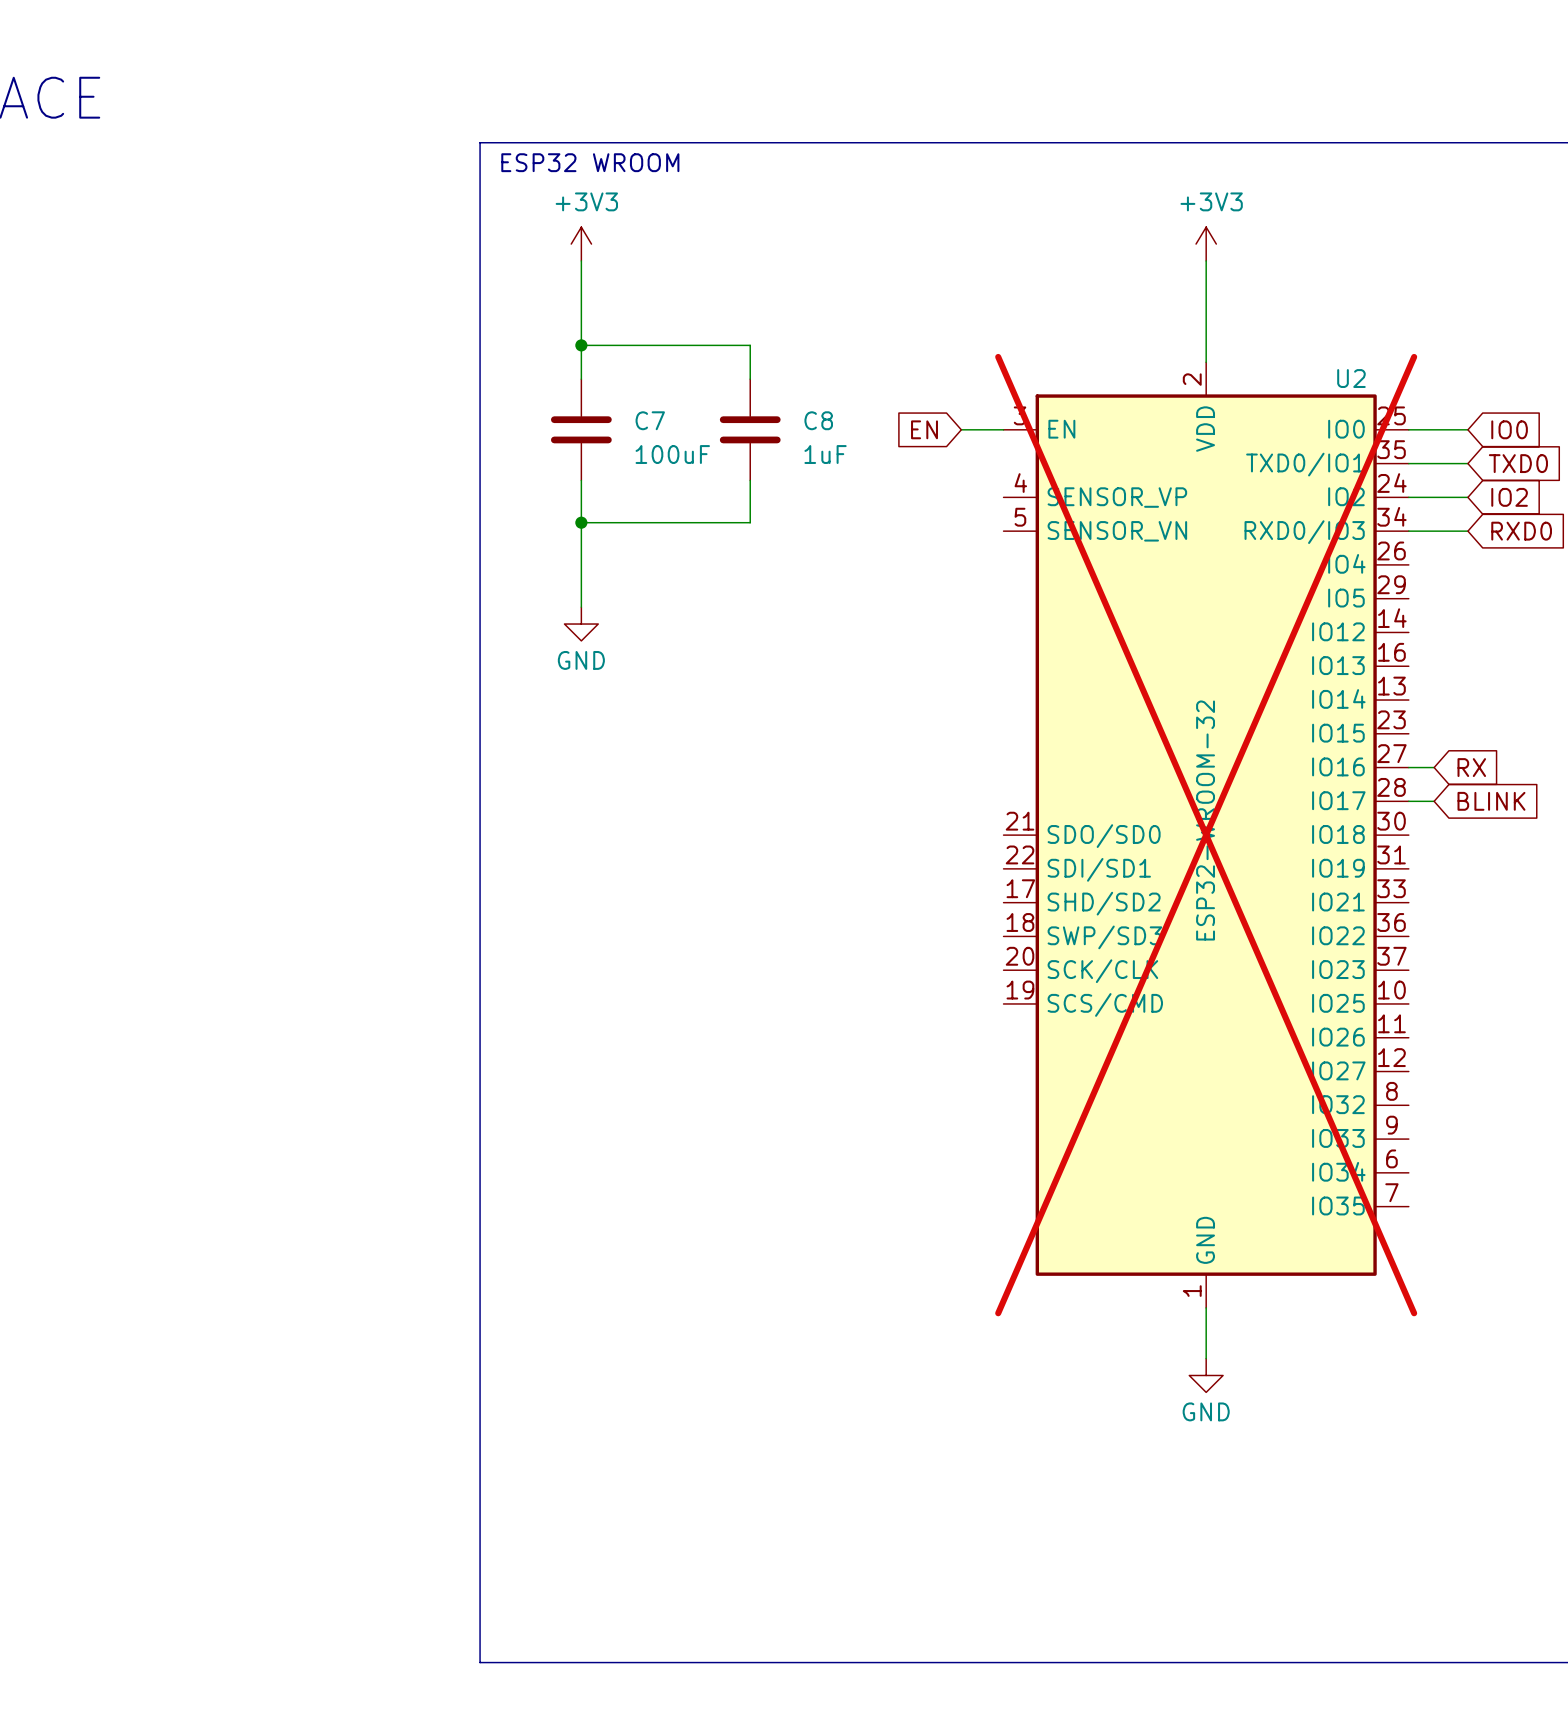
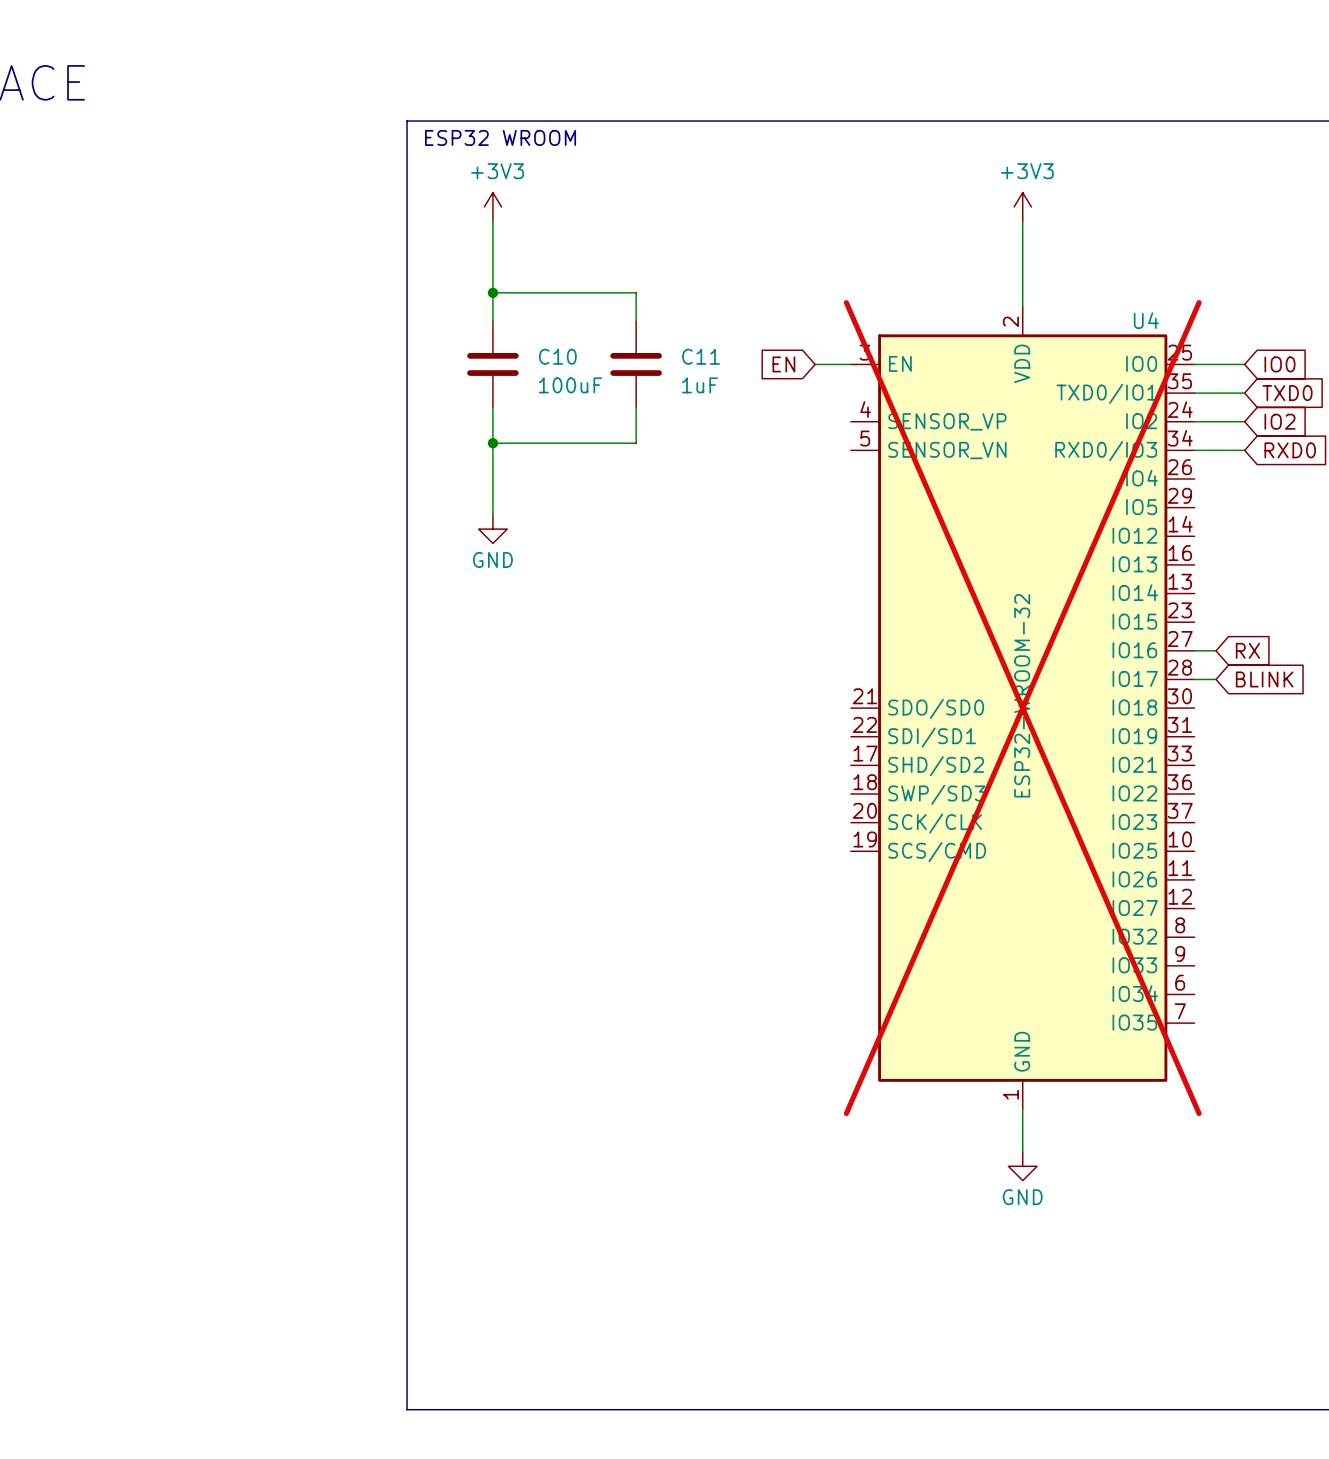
U2 name: U2 (1351, 378) -> U4 (1146, 320)
C7 name: C7 (650, 420) -> C10 (557, 356)
C8 name: C8 (818, 420) -> C11 (701, 356)

